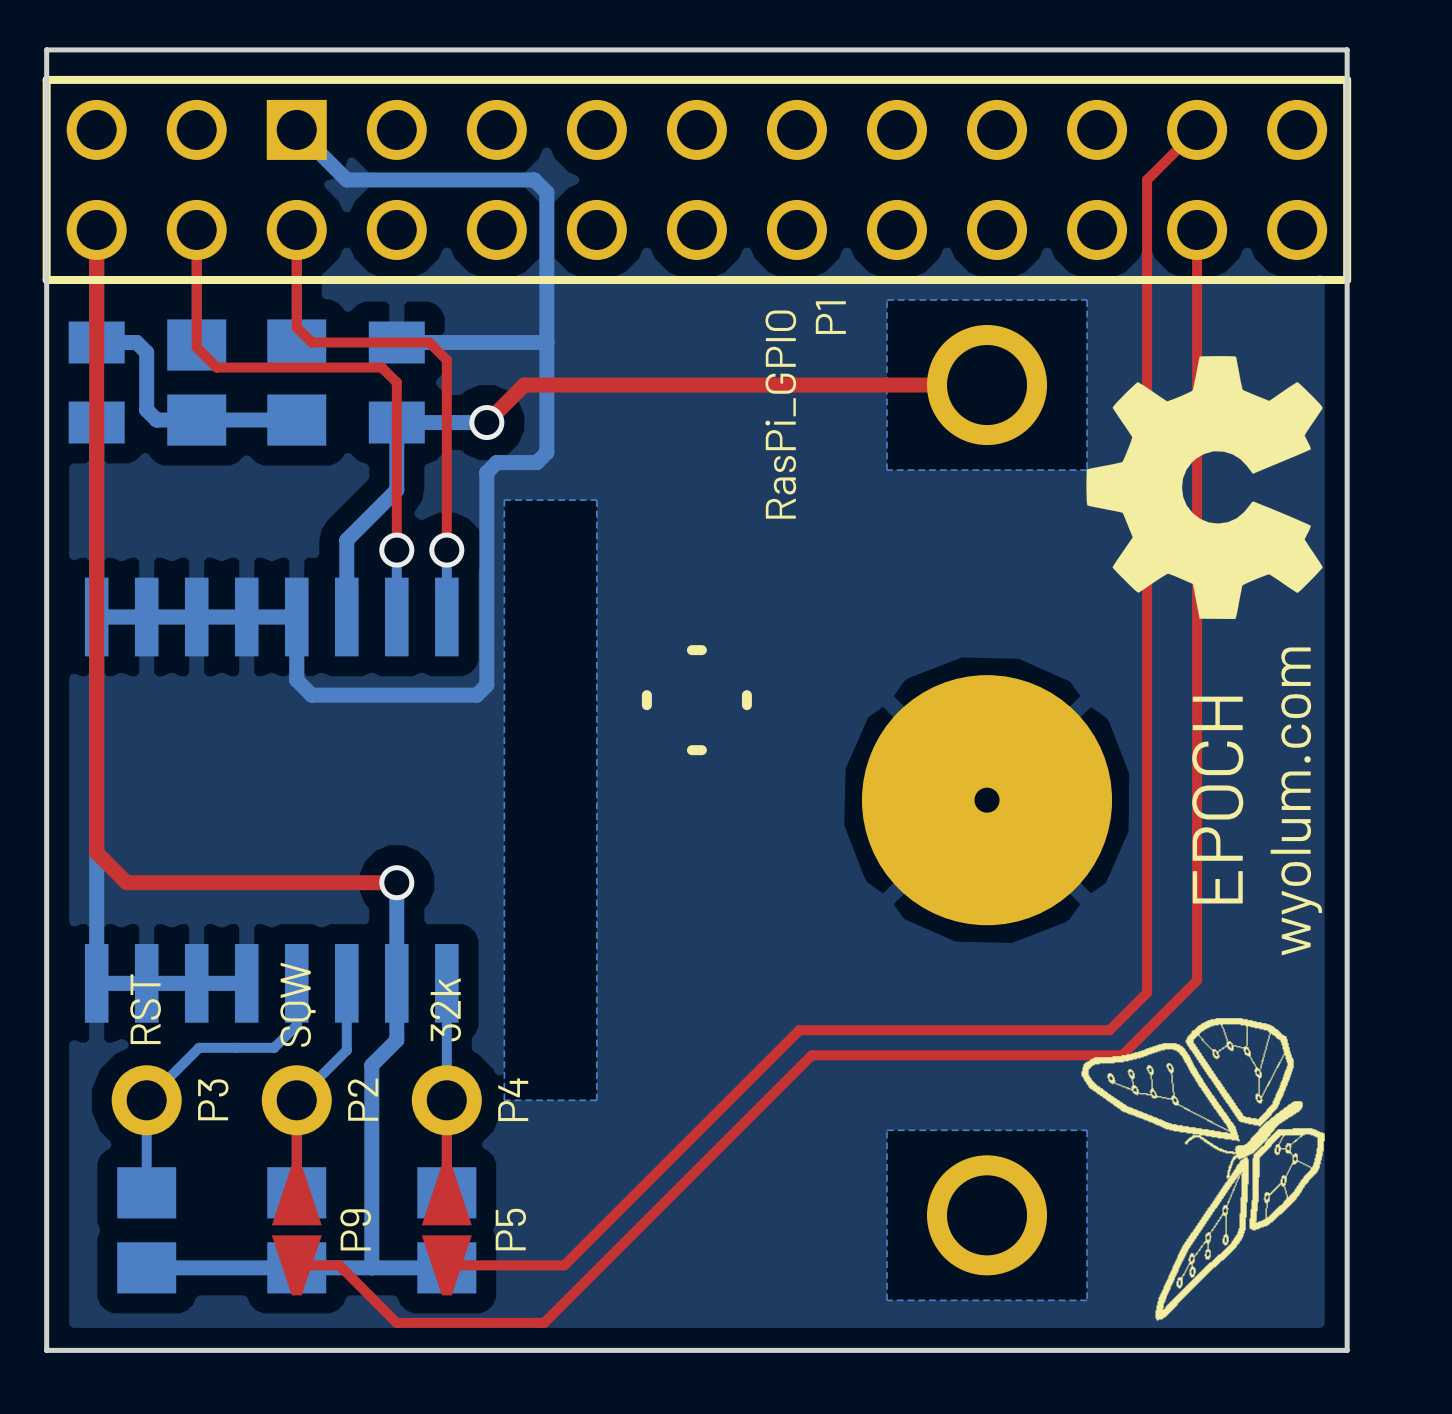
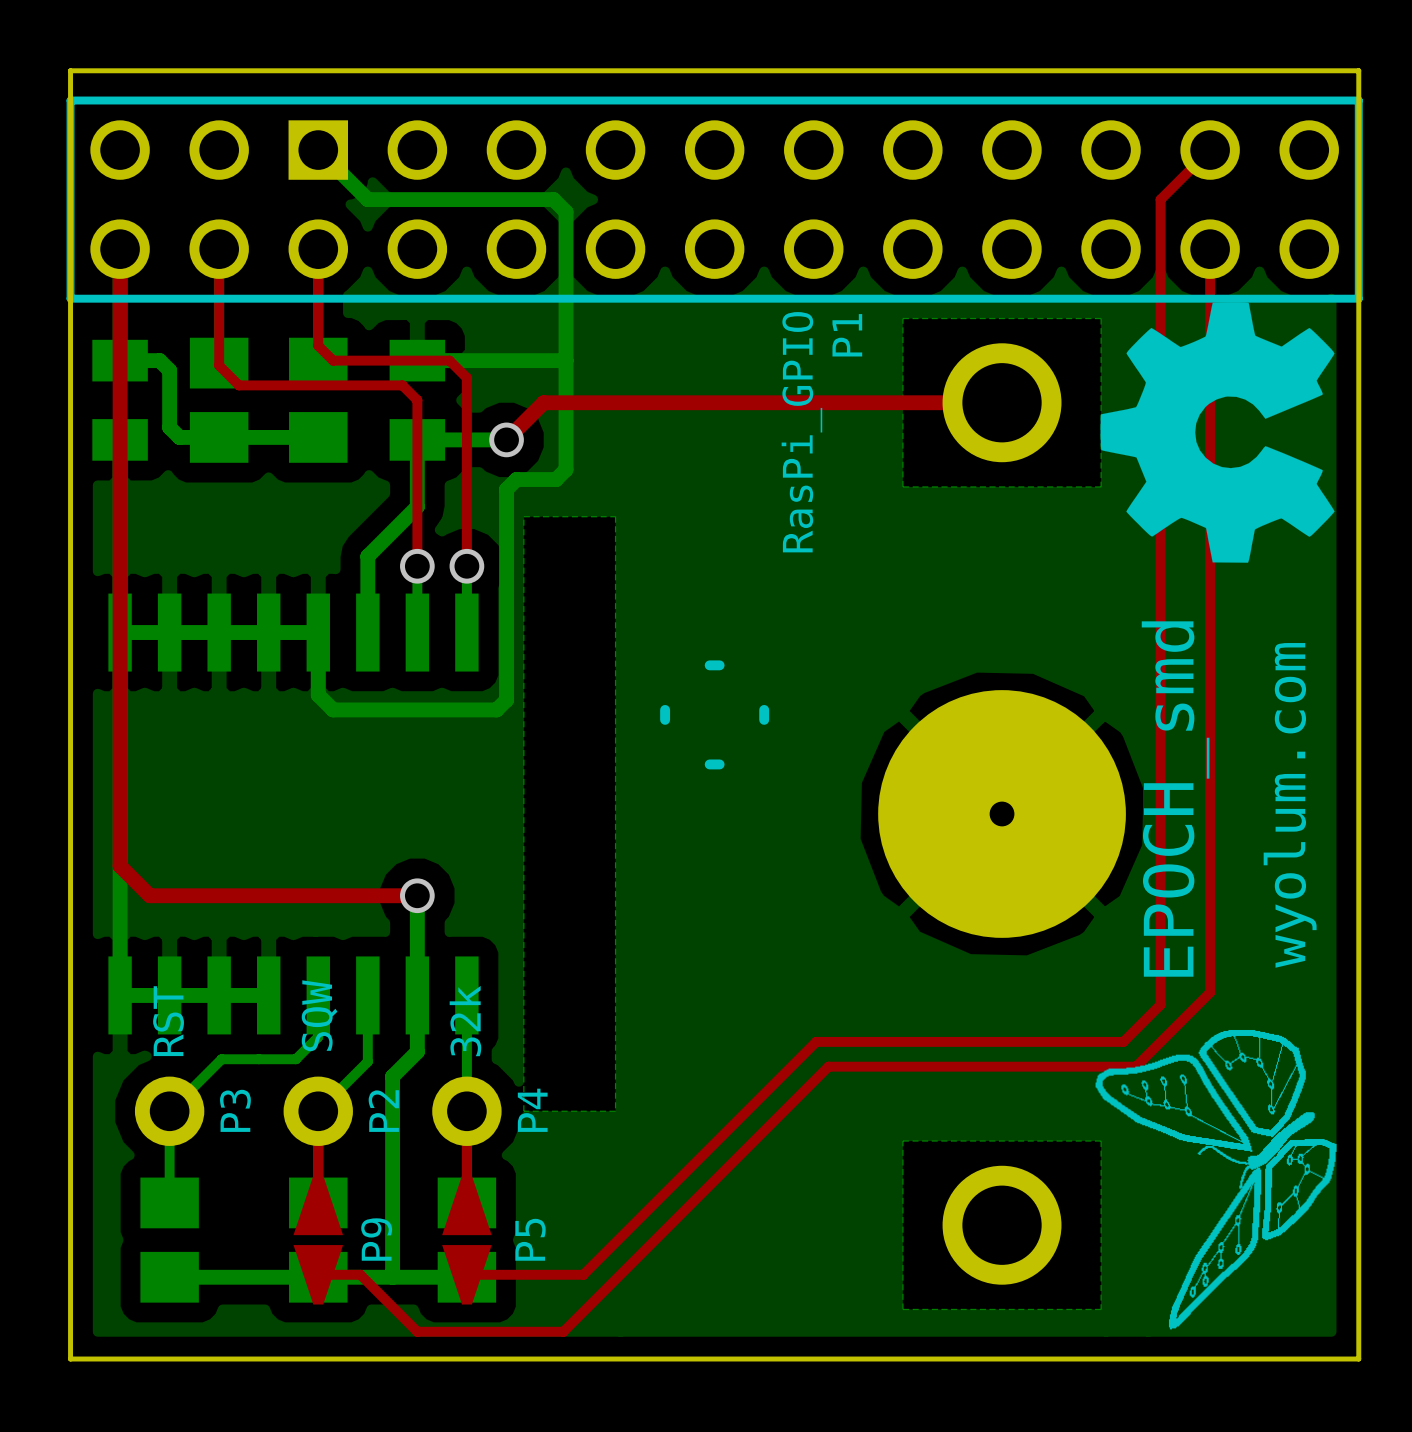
drawing position: (1204, 487) -> (1217, 432)
text: EPOCH (1217, 800) -> EPOCH_smd (1175, 799)
text position: wyolum.com (1296, 801) -> wyolum.com (1290, 805)

